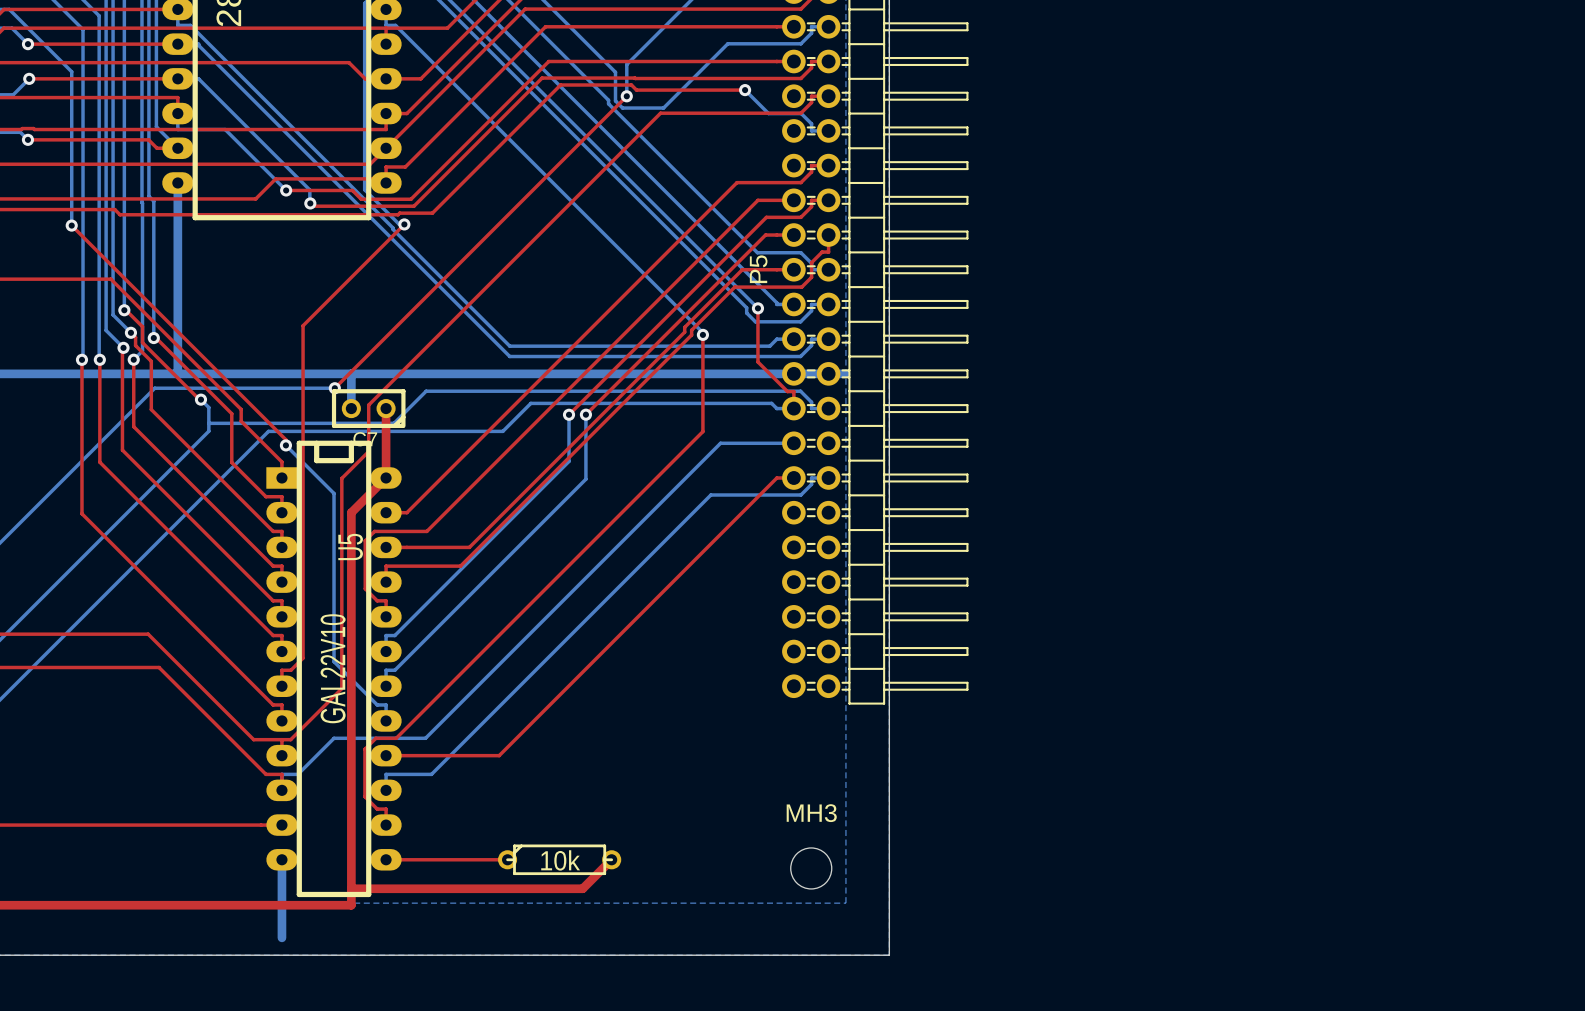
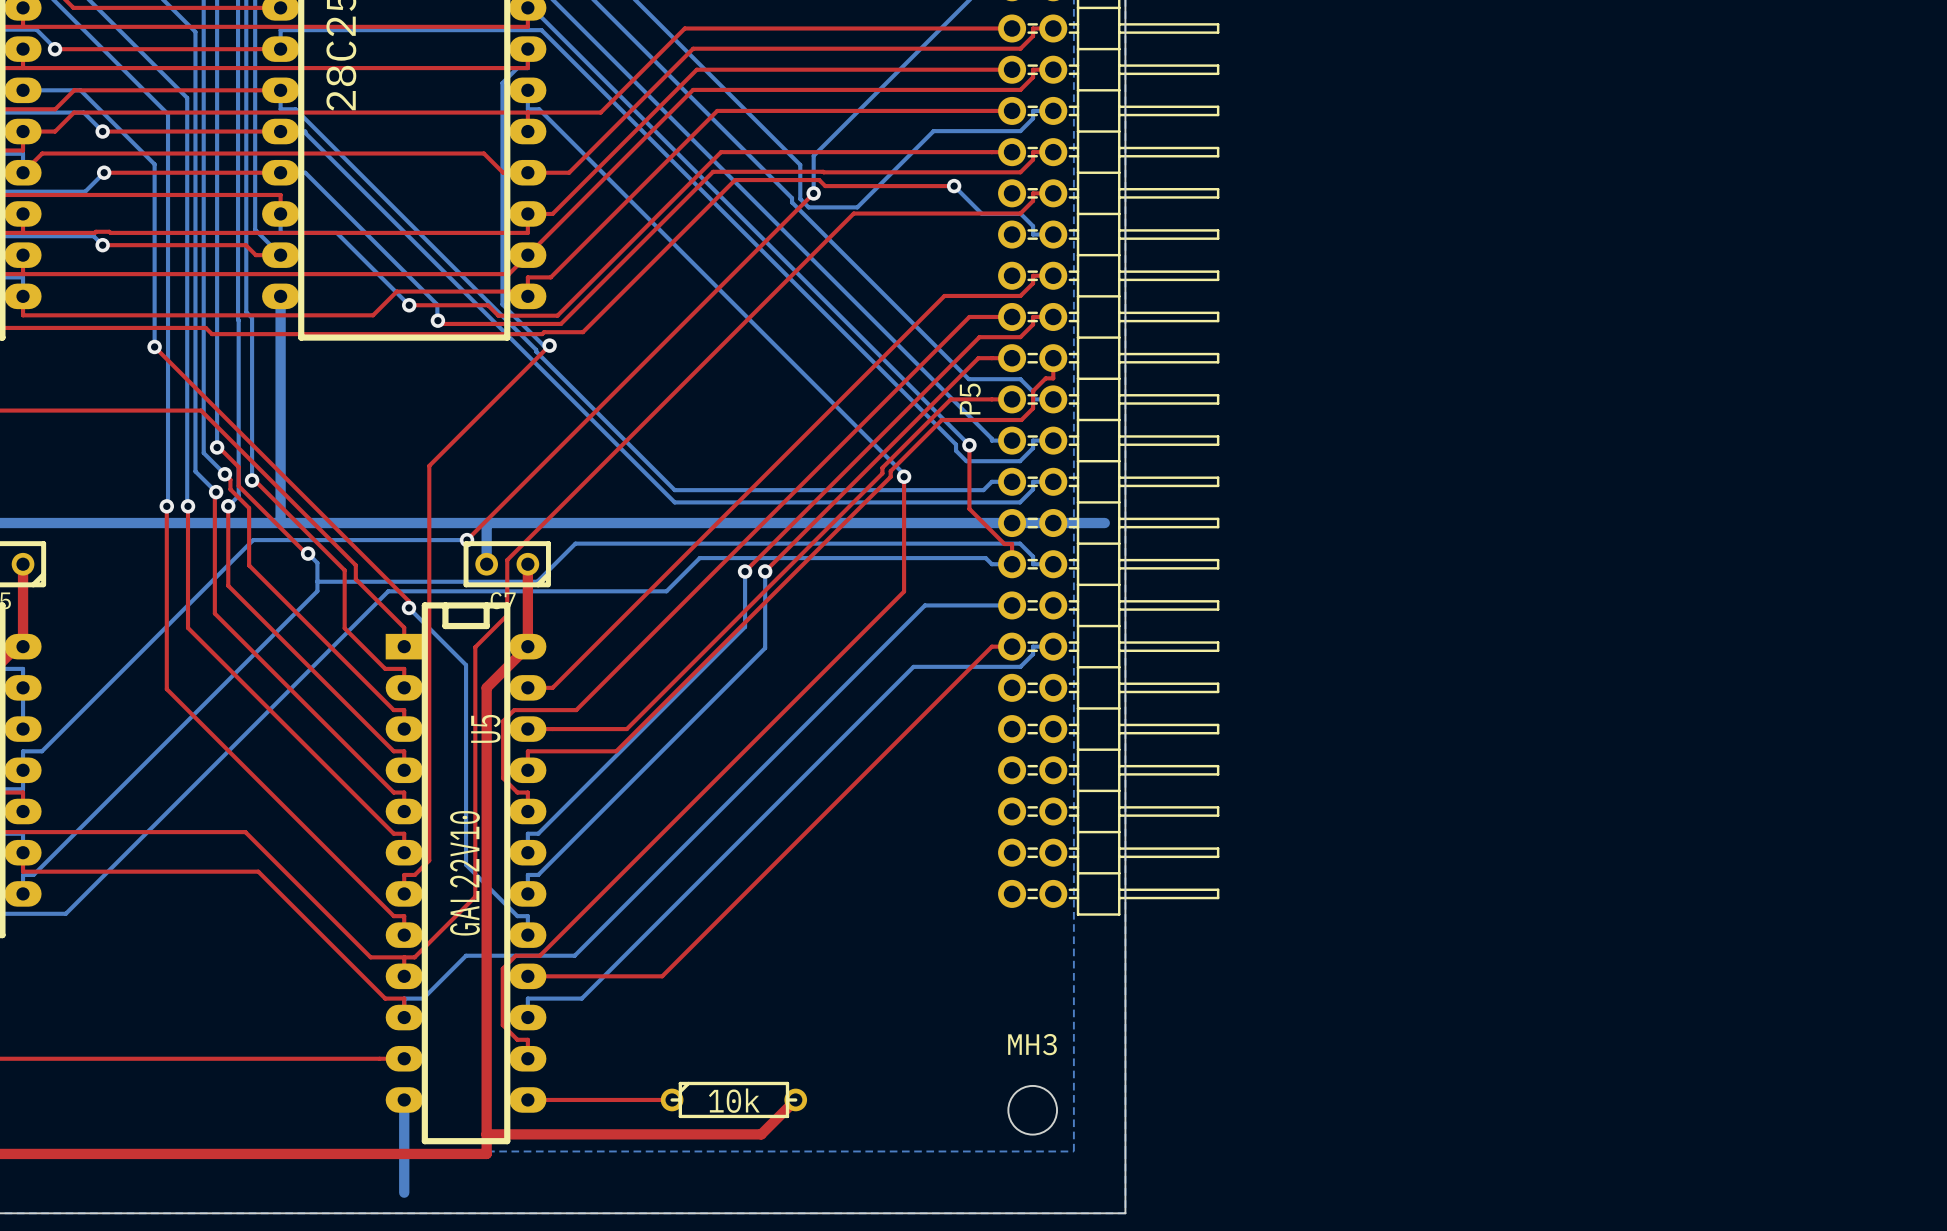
bottom track: none -> (1073, 523) (1104, 523)

